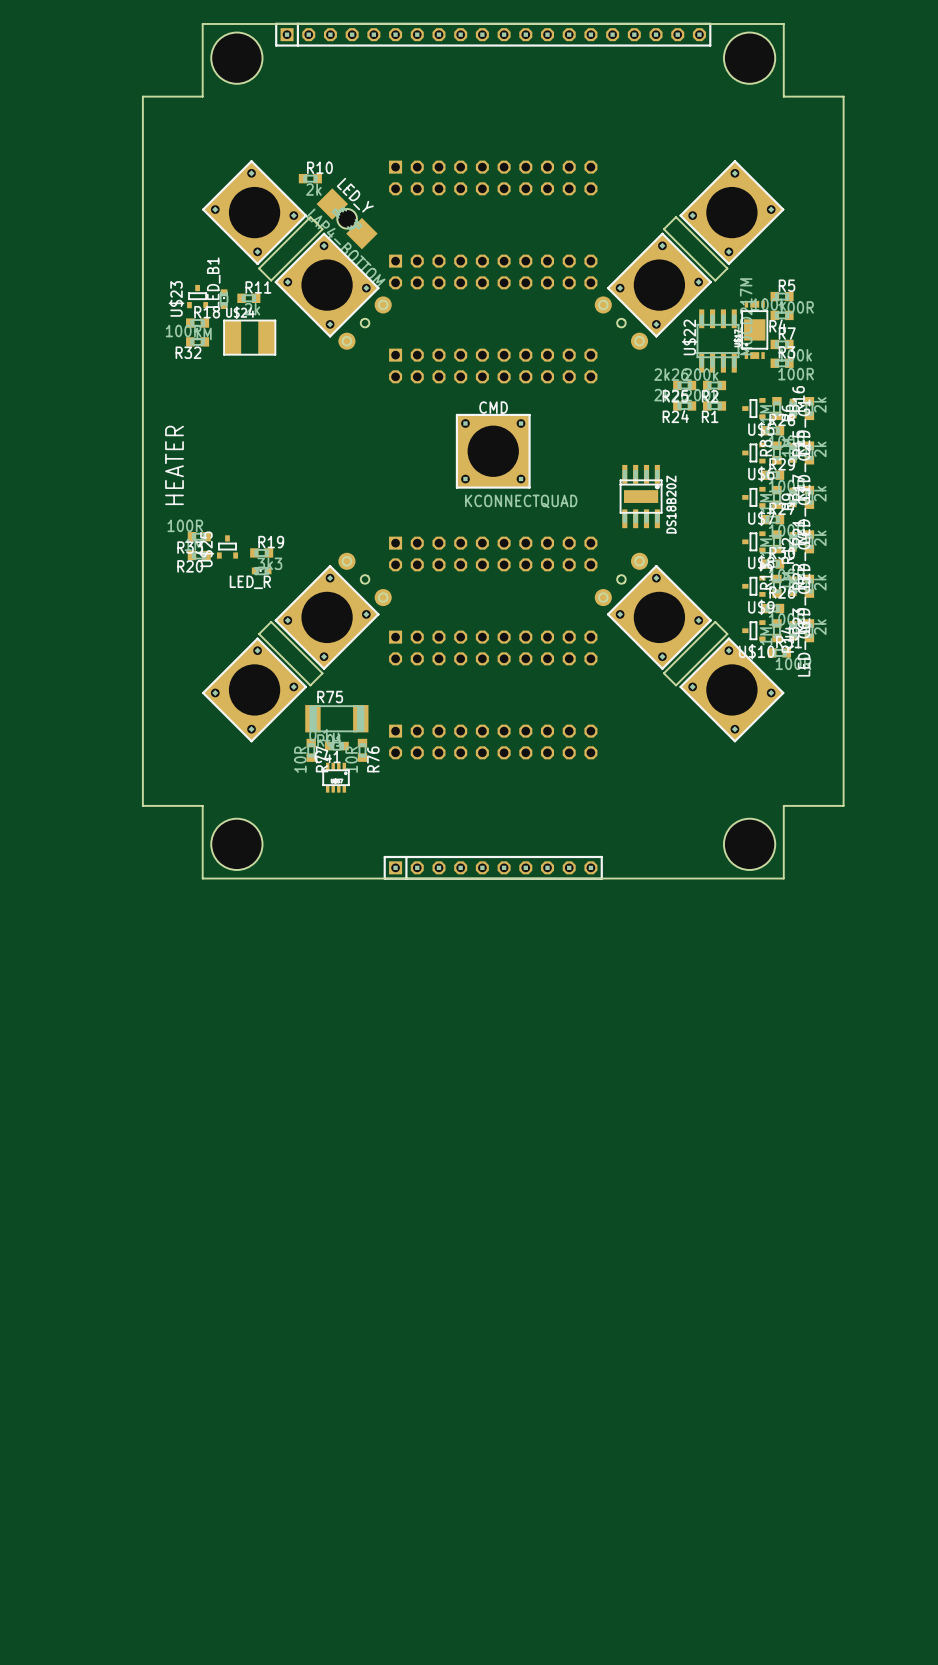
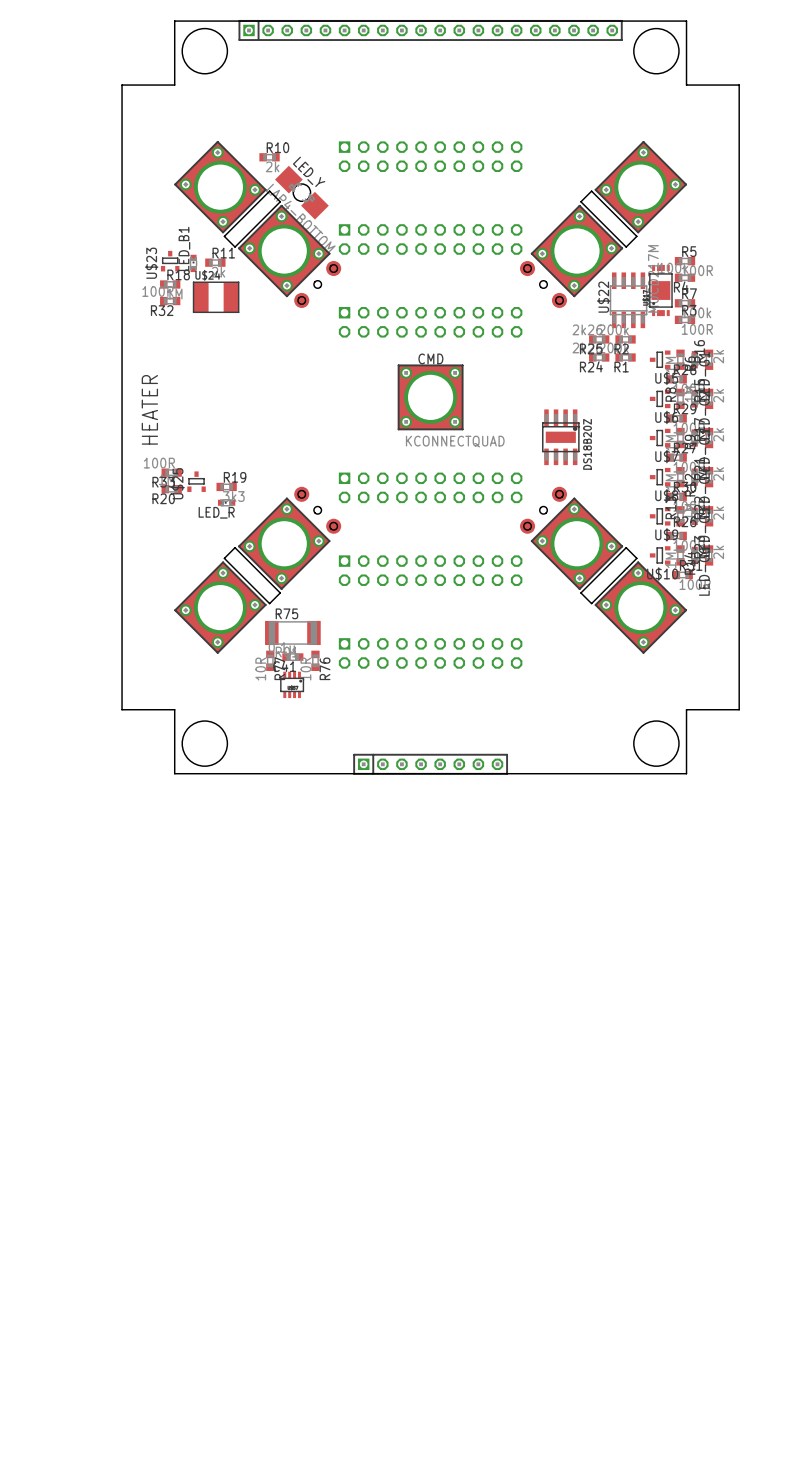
part footprint: [383, 855, 603, 880] -> [353, 753, 509, 775]

